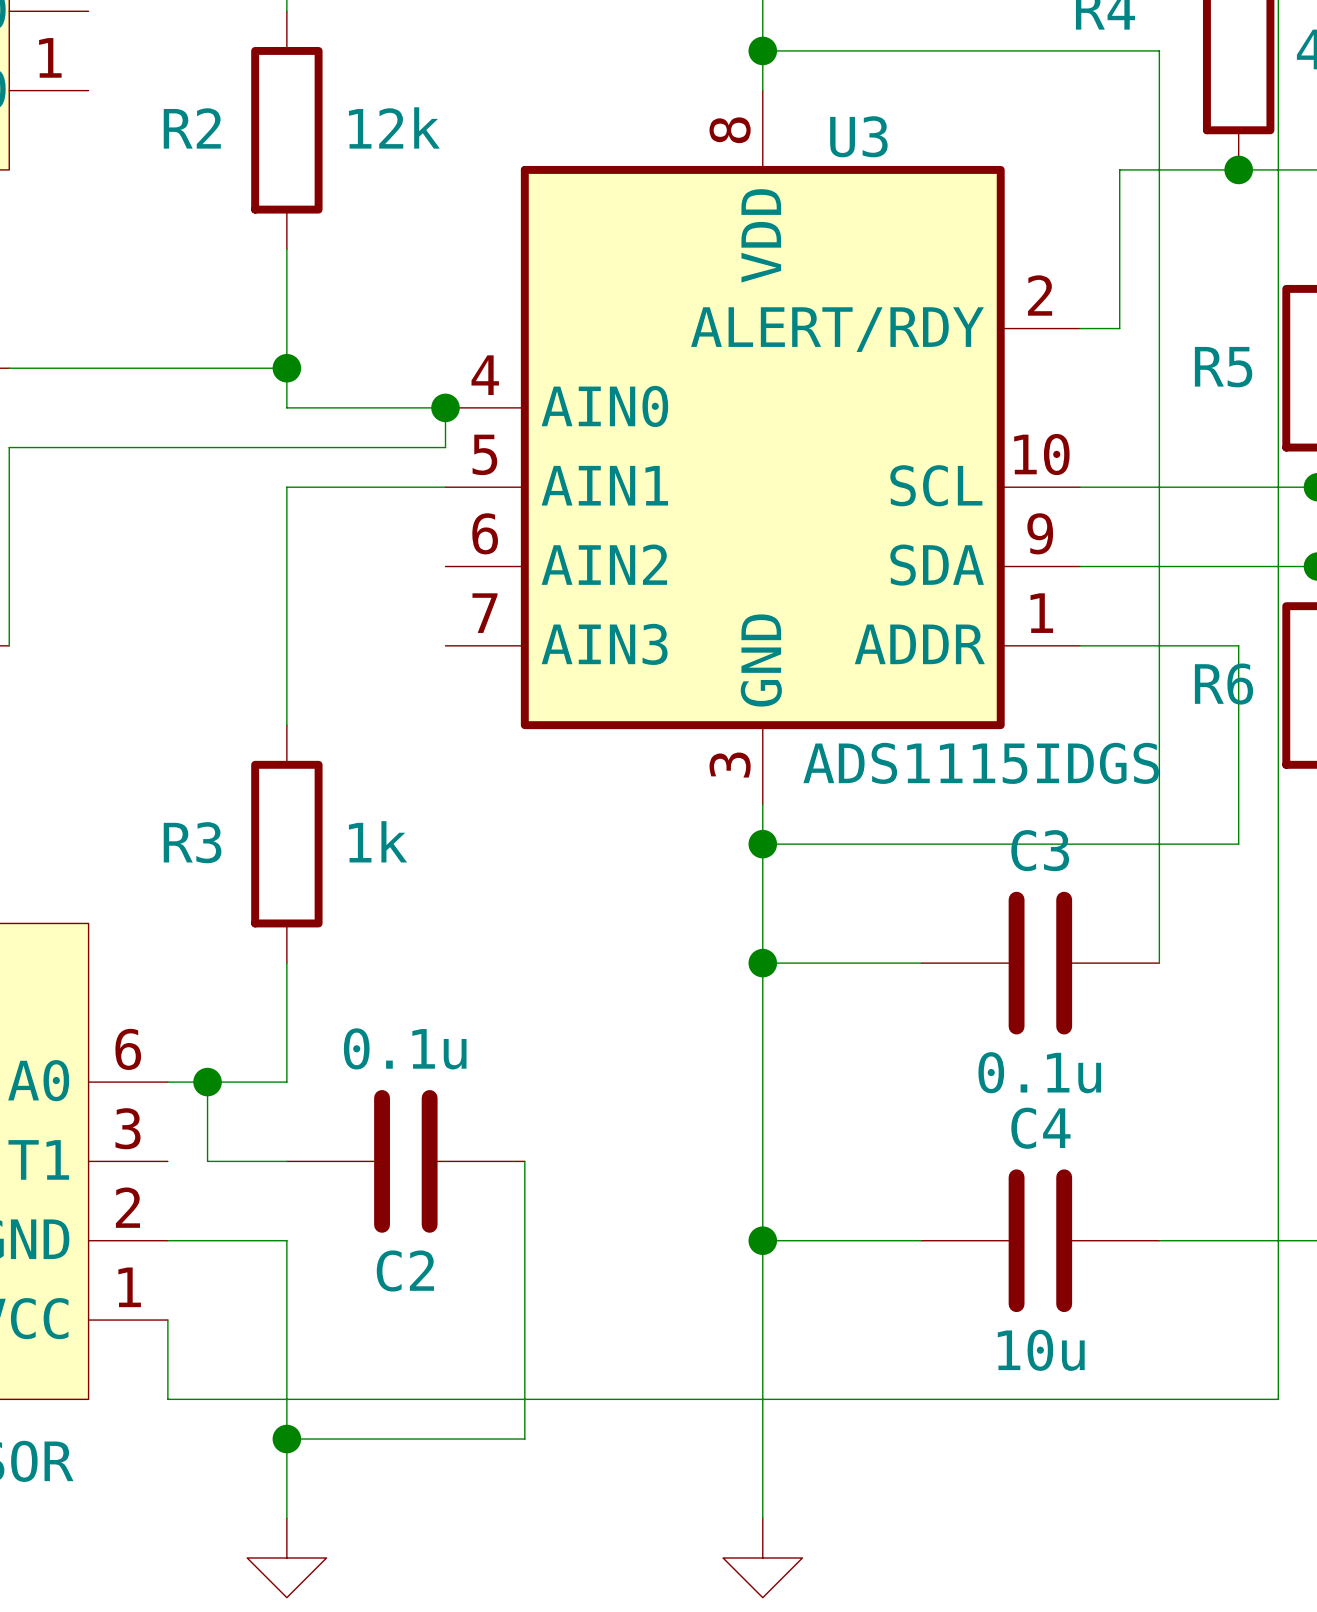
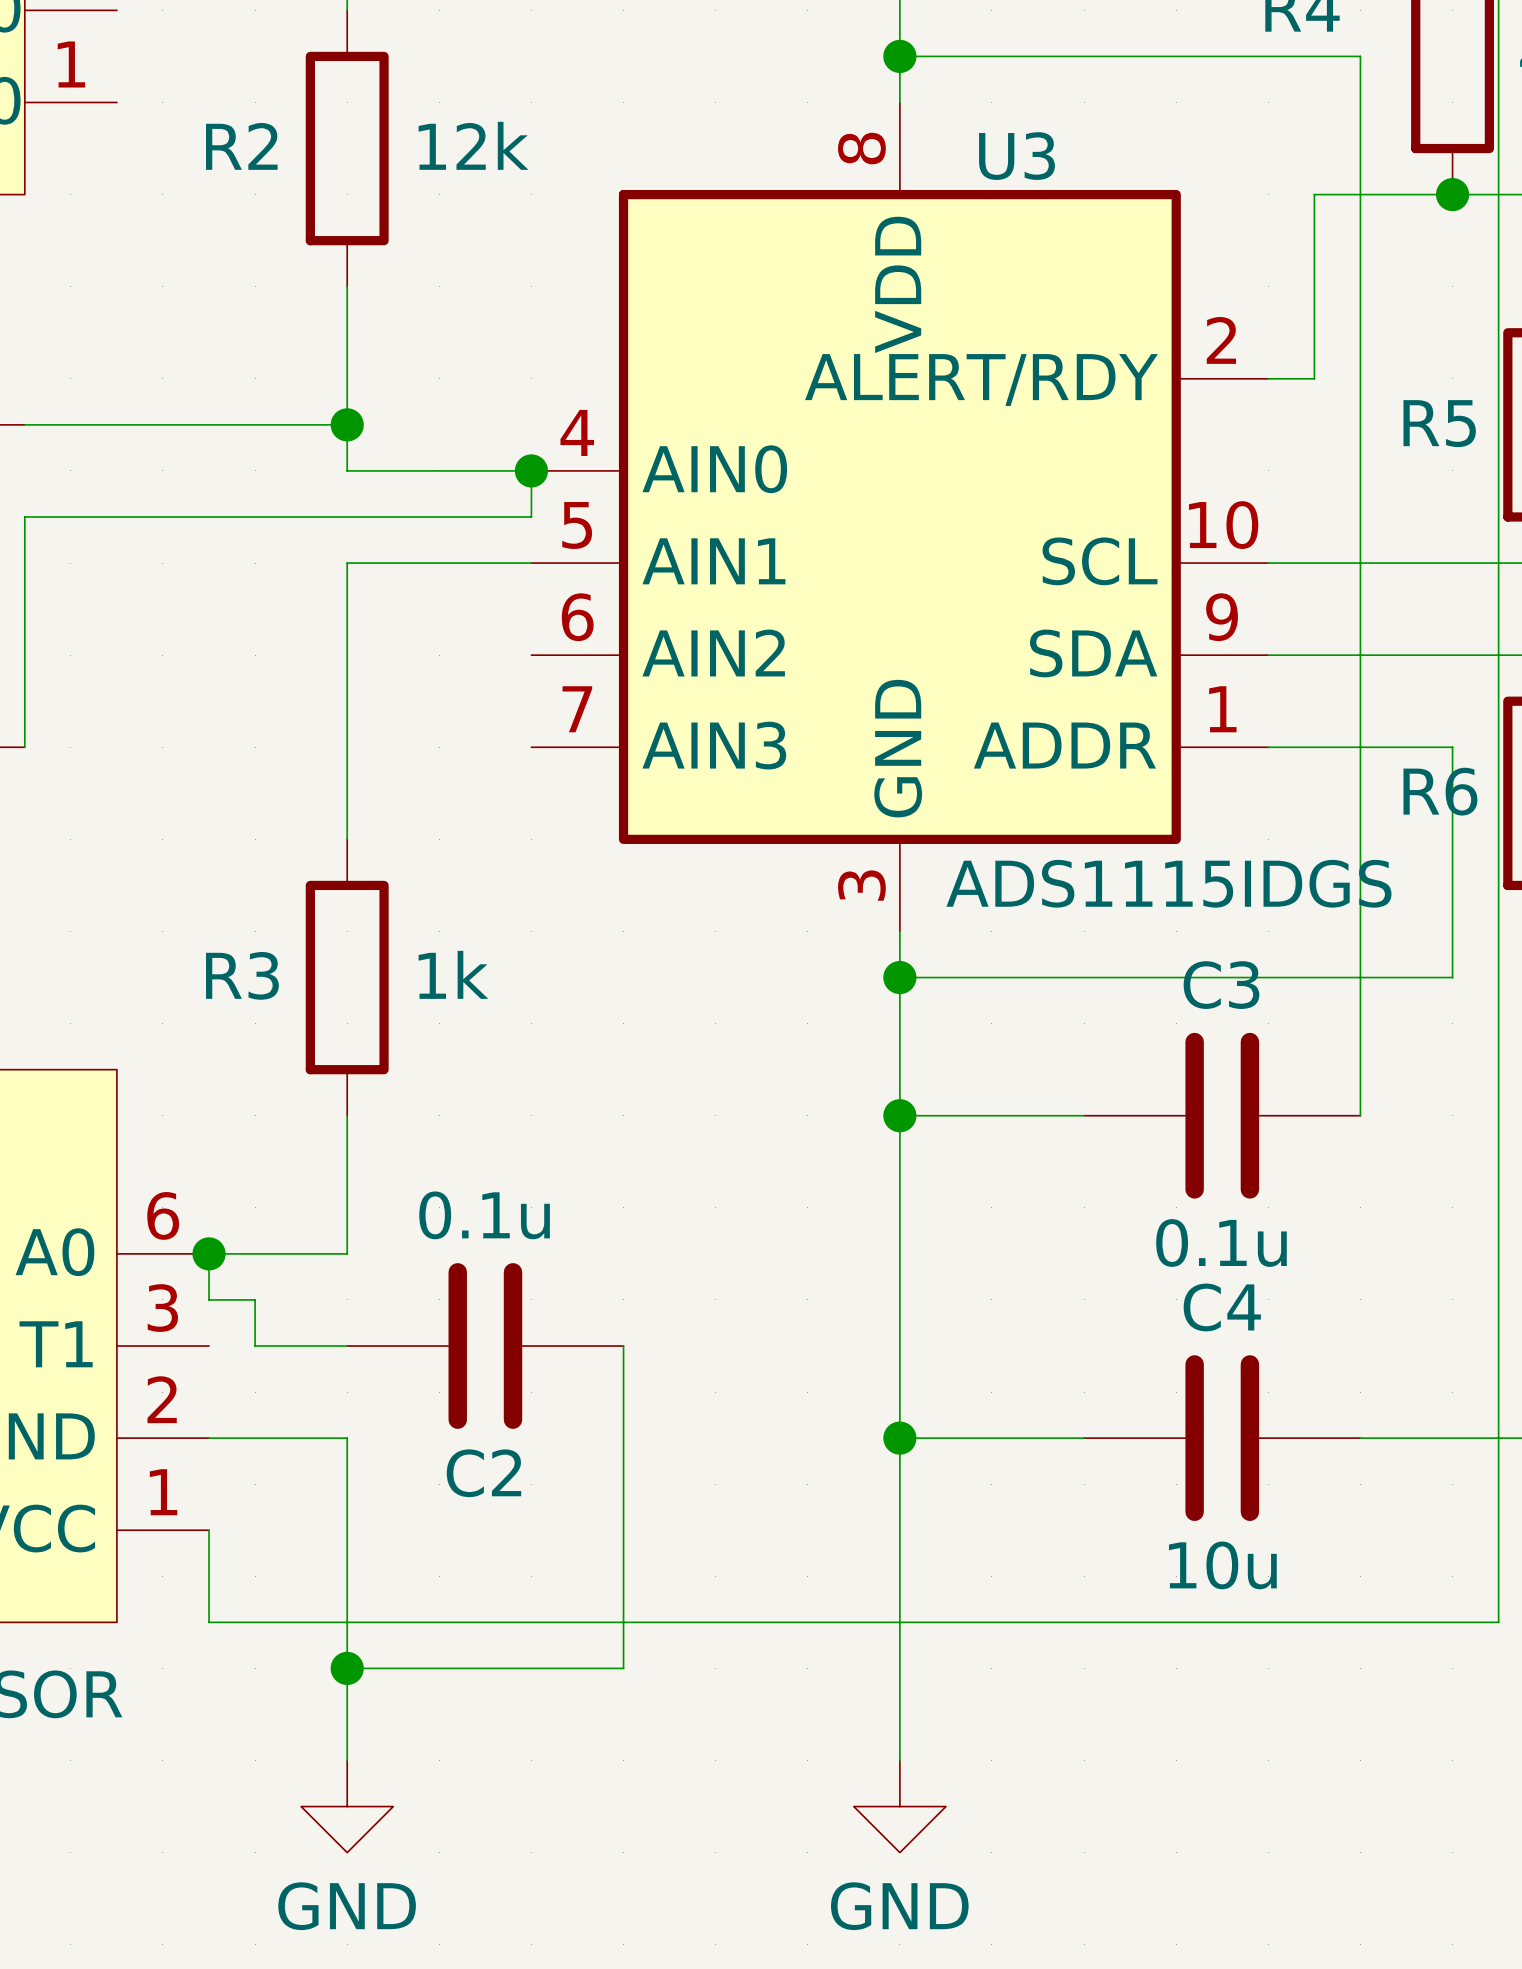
wire: (207, 1082) (207, 1121) -> (209, 1253) (209, 1299) (255, 1299)
junction position: (207, 1082) -> (209, 1253)

